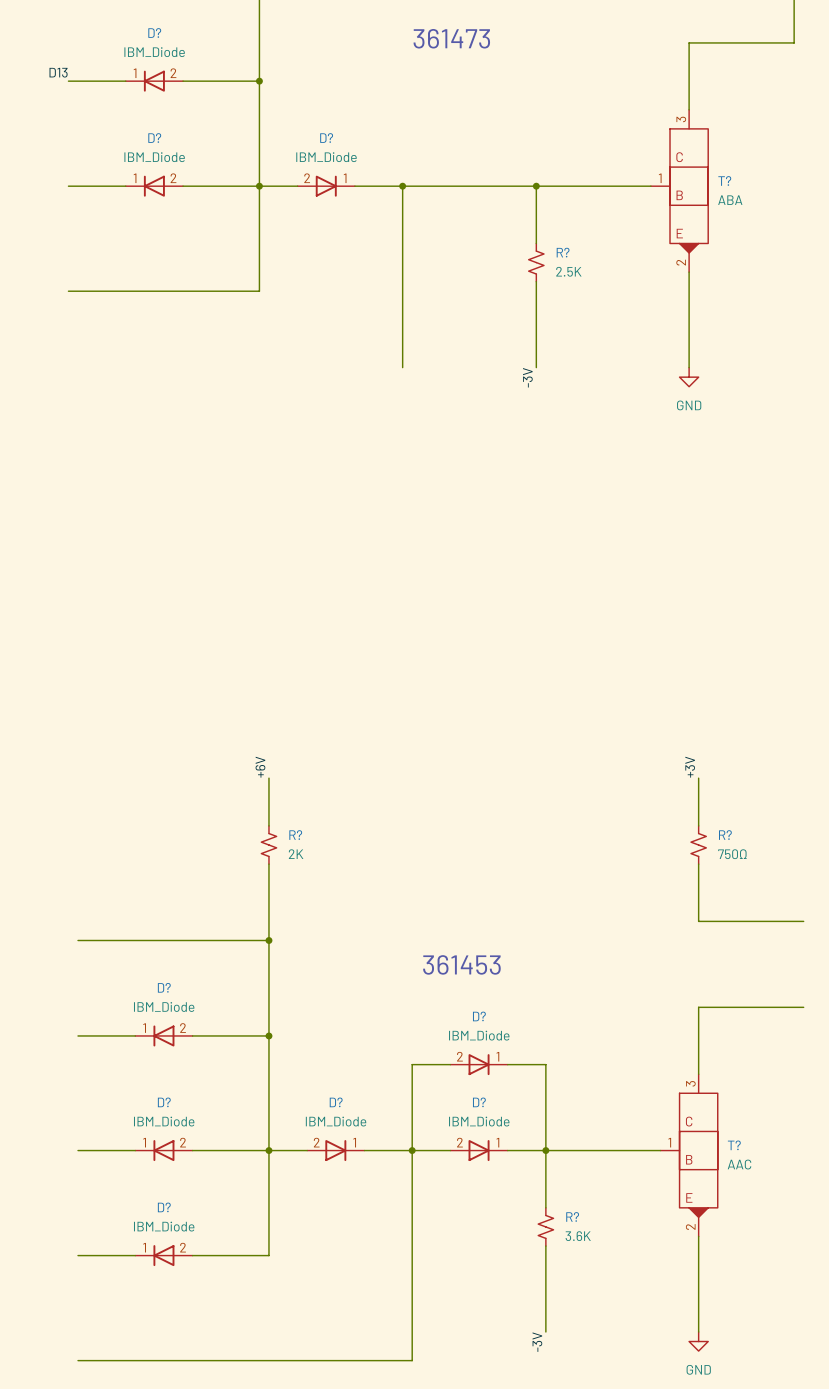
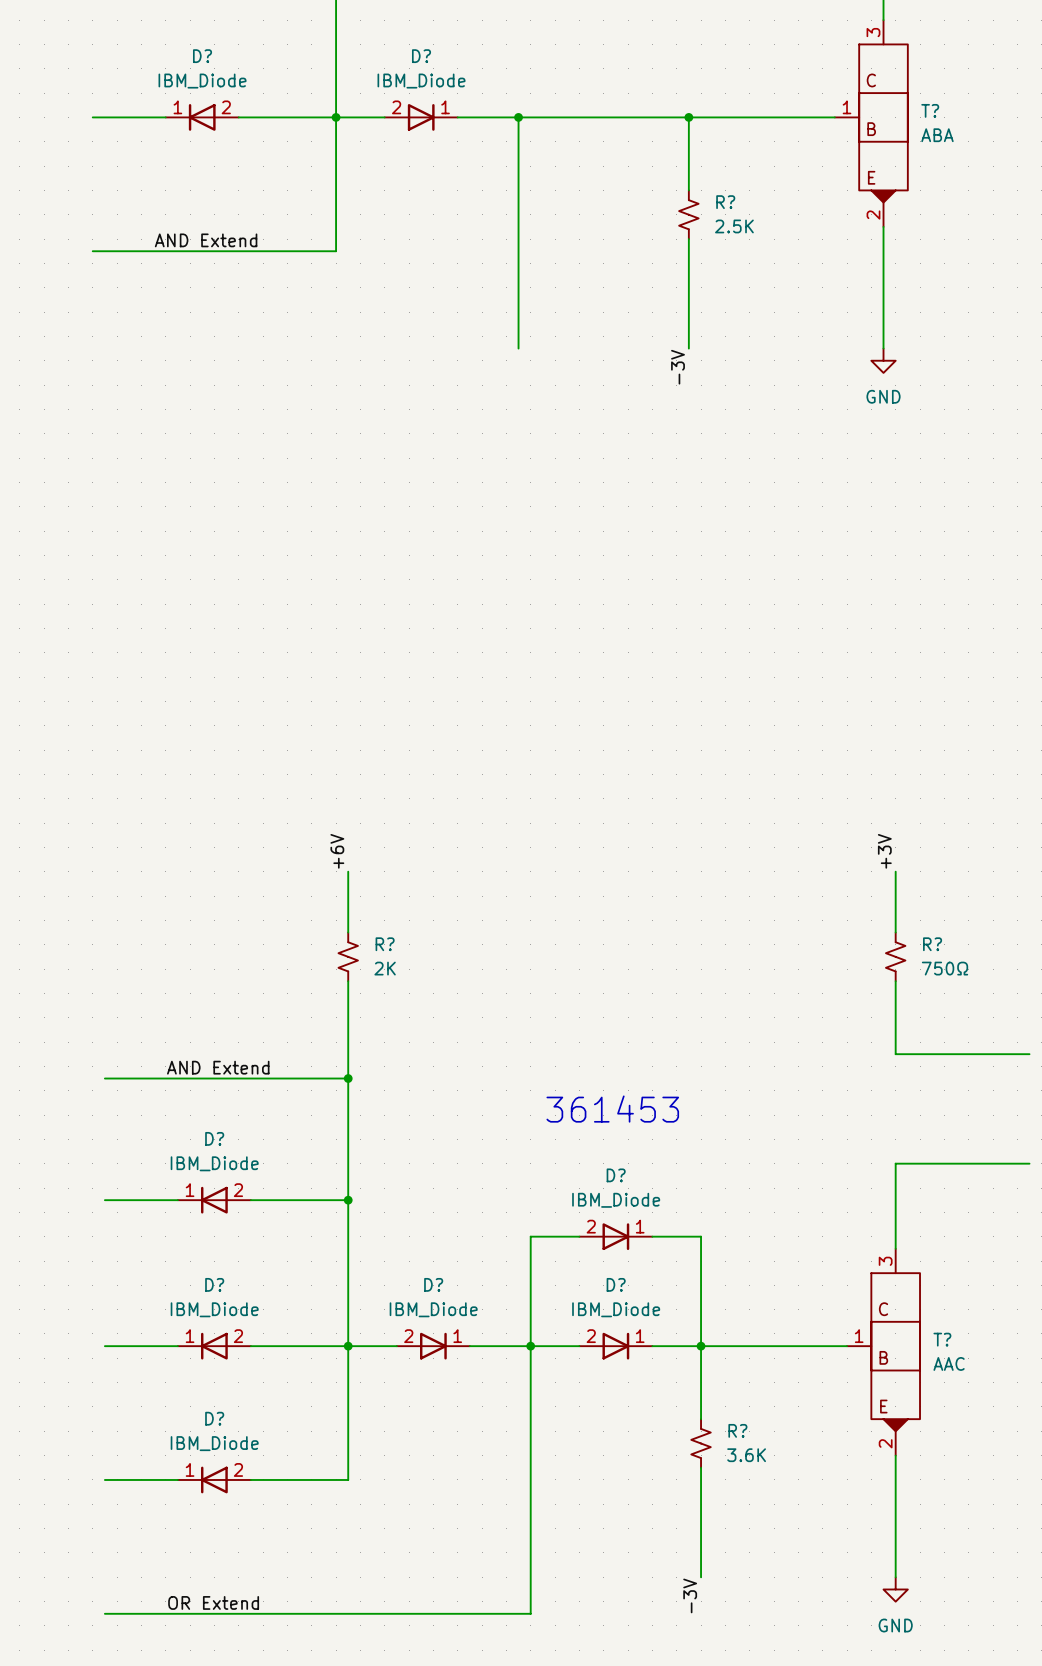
label: none -> AND Extend (206, 240)
label: none -> AND Extend (218, 1067)
label: none -> OR Extend (213, 1602)

